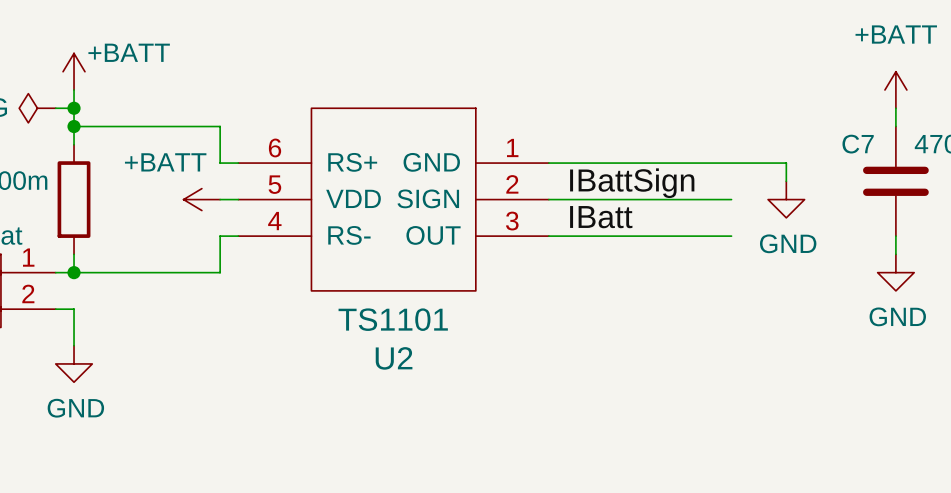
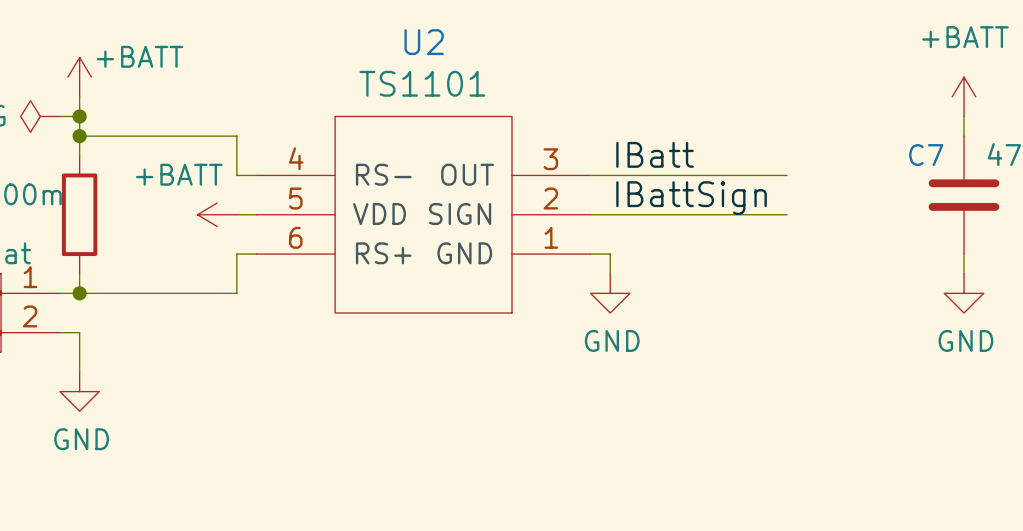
wire: (731, 163) (786, 163) (786, 181) -> none
U2 flip: as is (393, 199) -> up-down (423, 214)
power symbol position: GND (786, 199) -> GND (610, 293)
label position: IBatt (601, 217) -> IBatt (655, 154)
wire: (567, 236) (731, 236) -> (610, 254) (610, 273)

